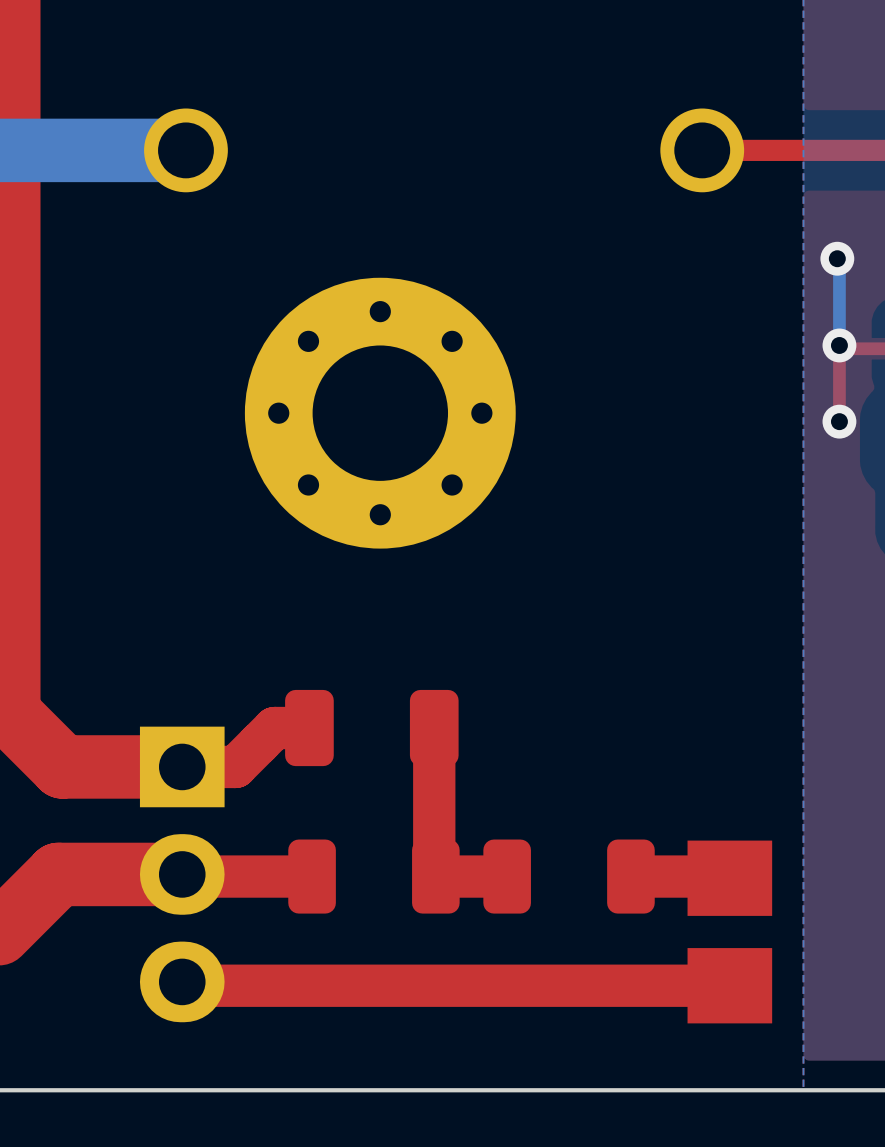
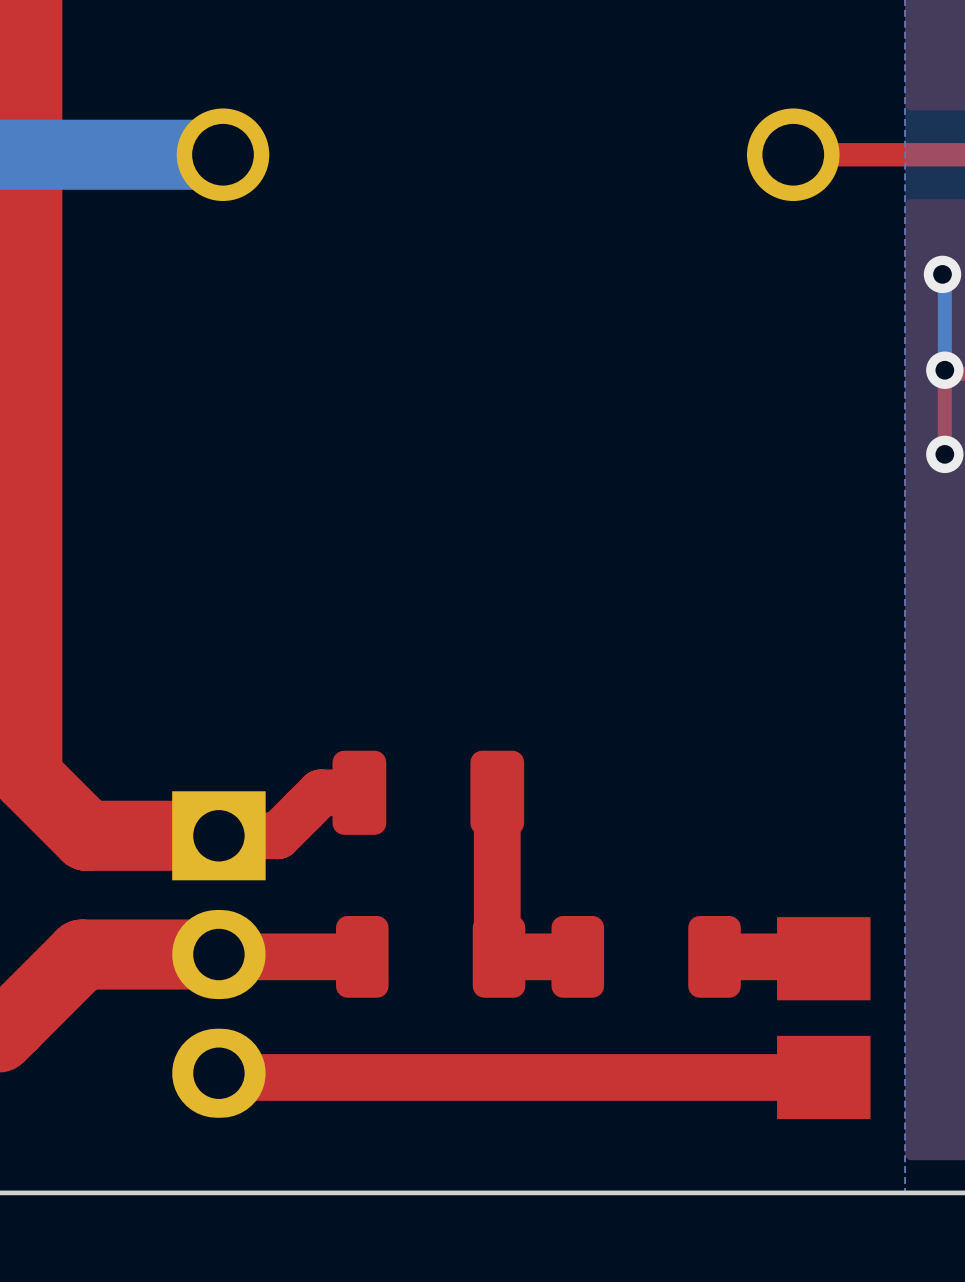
part: (380, 413) -> none

